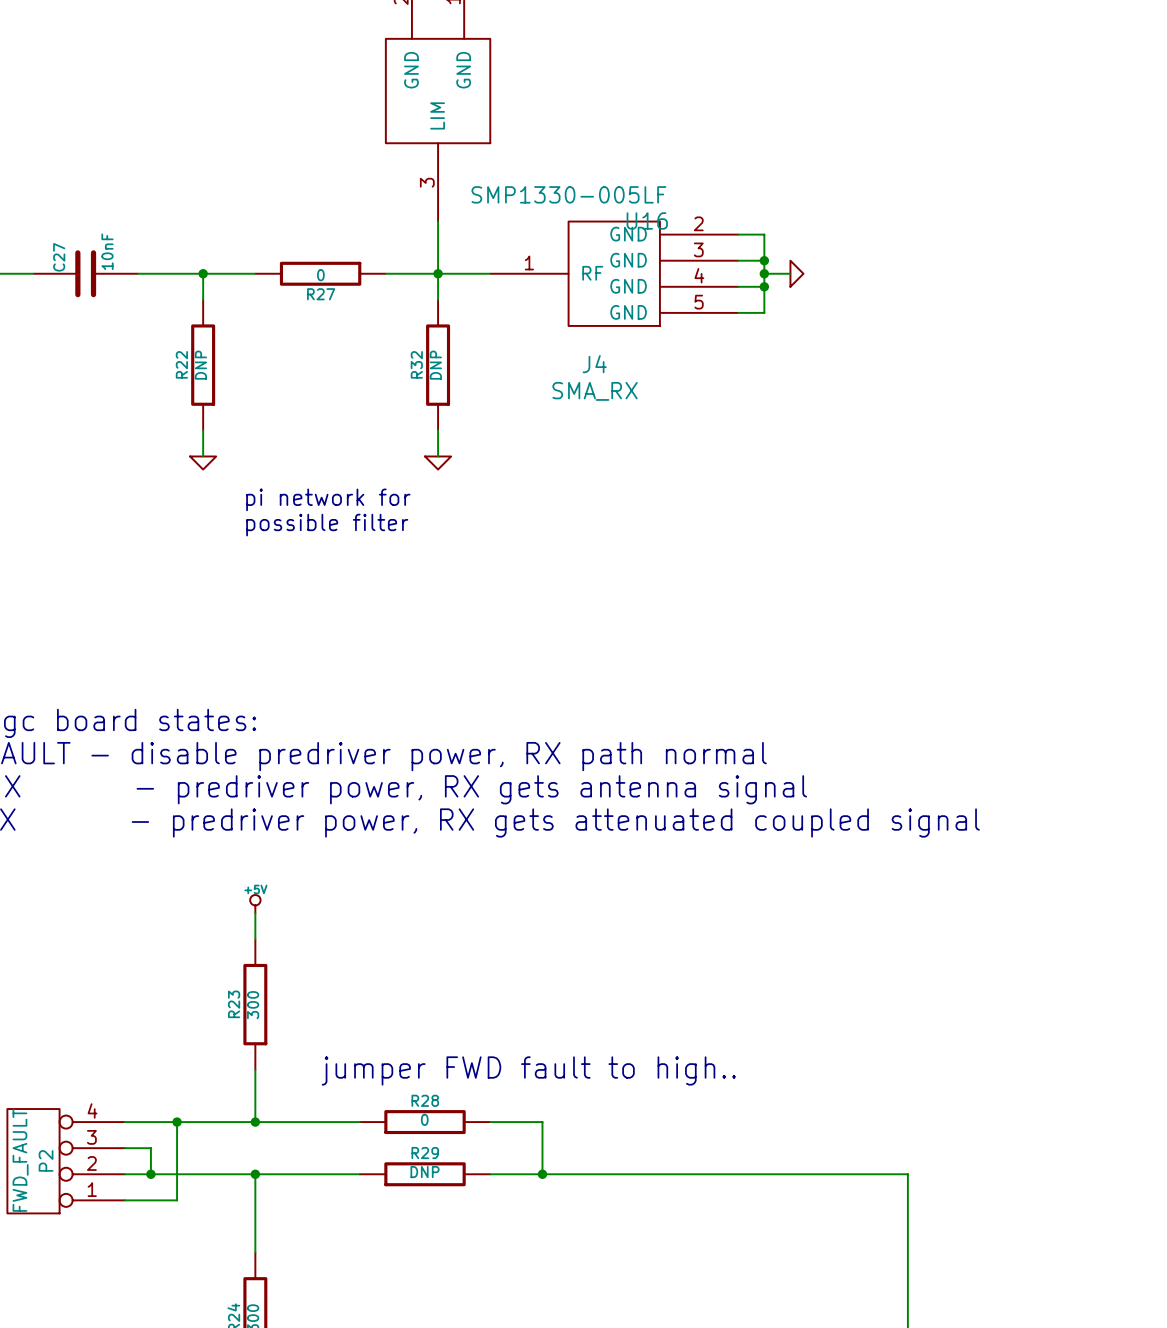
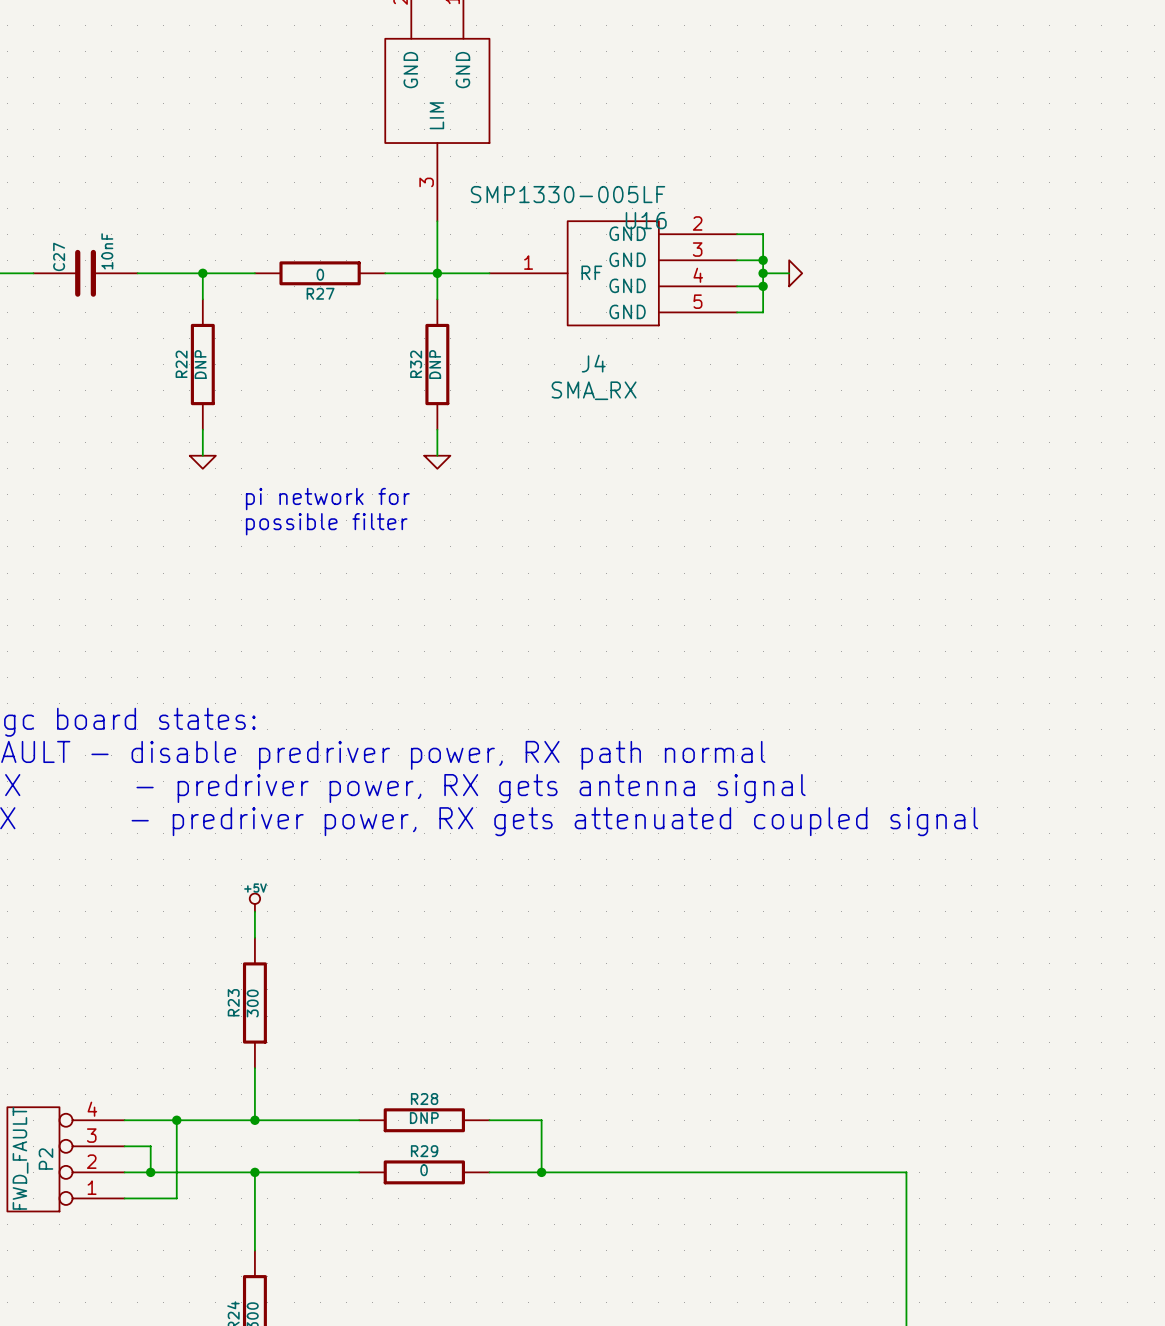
text: jumper FWD fault to high.. (528, 1070) -> none
R28 value: 0 (424, 1119) -> DNP (424, 1118)
R29 value: DNP (425, 1172) -> 0 (424, 1170)

